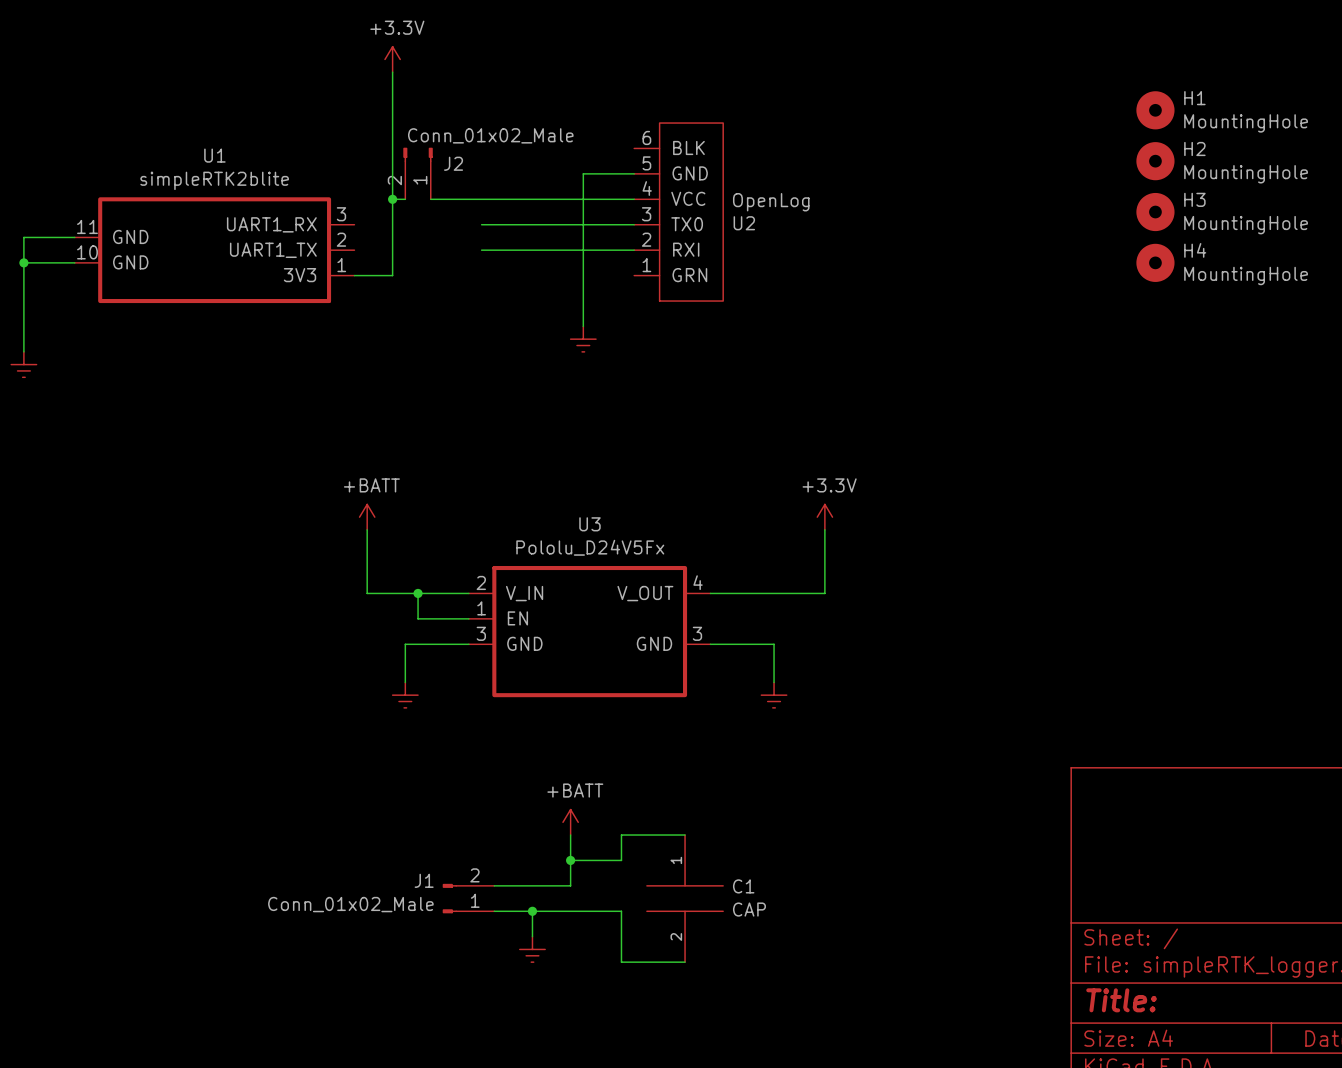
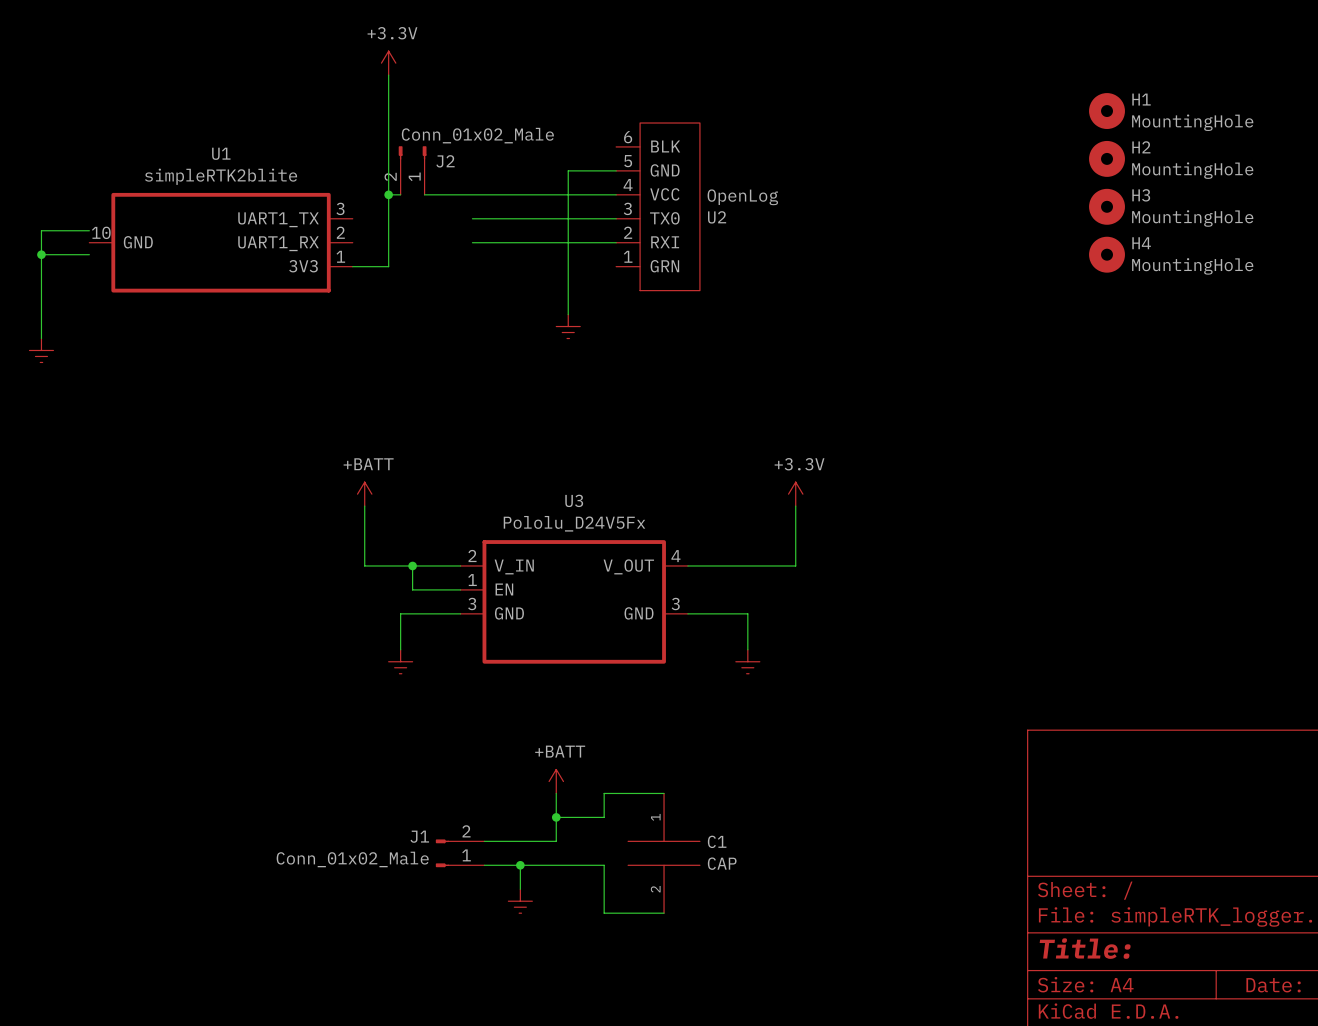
U1 symbol: [74, 197, 355, 304] -> [89, 192, 353, 293]

